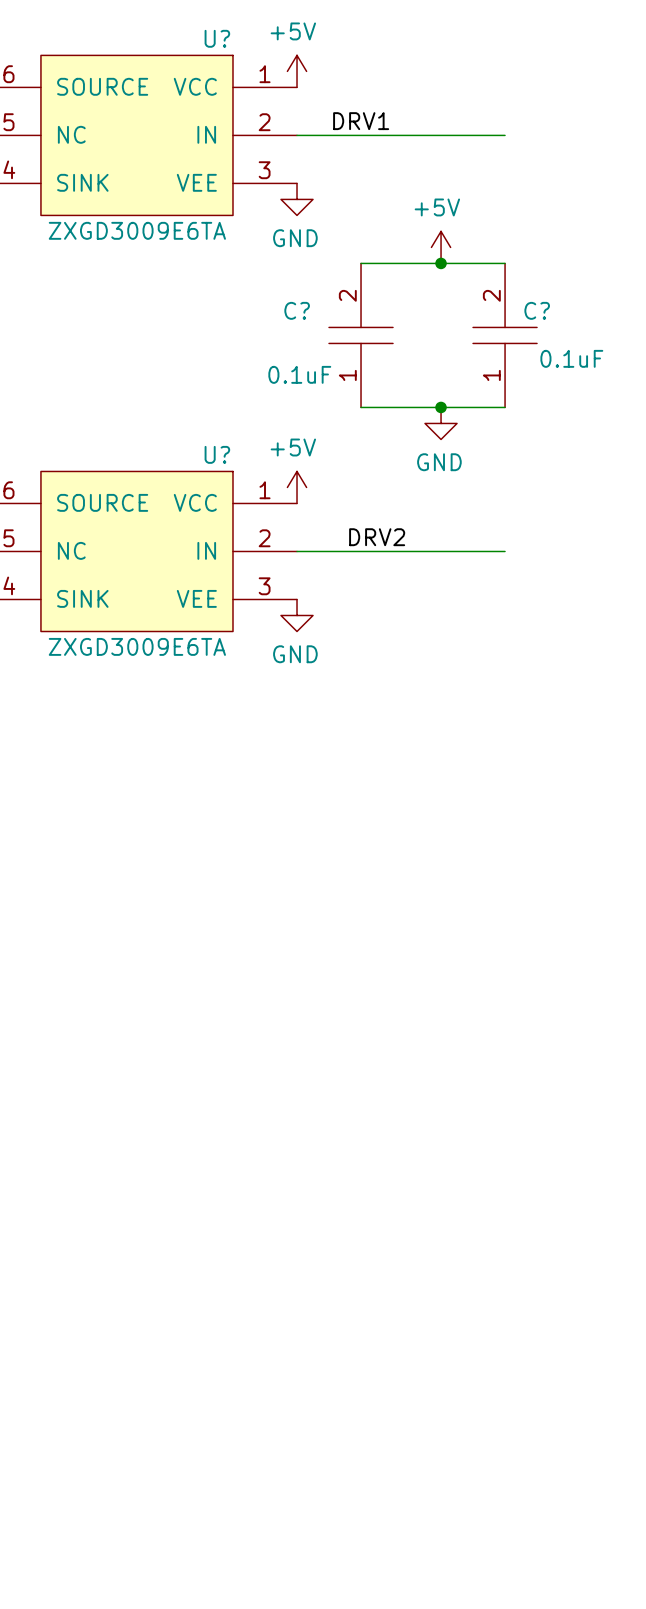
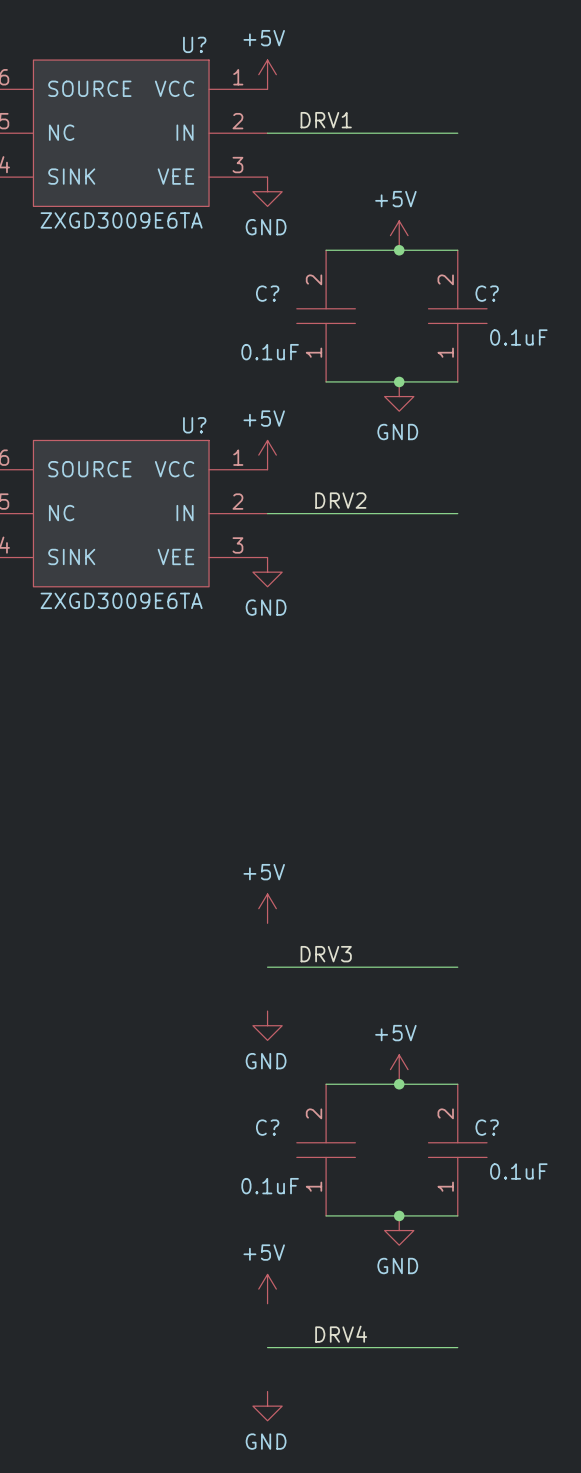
power symbol: none -> +5V (267, 908)
label: none -> DRV3 (326, 954)
wire: none -> (267, 967) (457, 967)
power symbol: none -> GND (267, 1025)
power symbol: none -> +5V (399, 1069)
wire: none -> (326, 1084) (457, 1084)
junction: none -> (399, 1084)
C?: none -> (326, 1150)
C?: none -> (457, 1150)
wire: none -> (326, 1215) (457, 1215)
junction: none -> (399, 1215)
power symbol: none -> GND (399, 1230)
power symbol: none -> +5V (267, 1289)
label: none -> DRV4 (341, 1334)
wire: none -> (267, 1347) (457, 1347)
power symbol: none -> GND (267, 1406)

